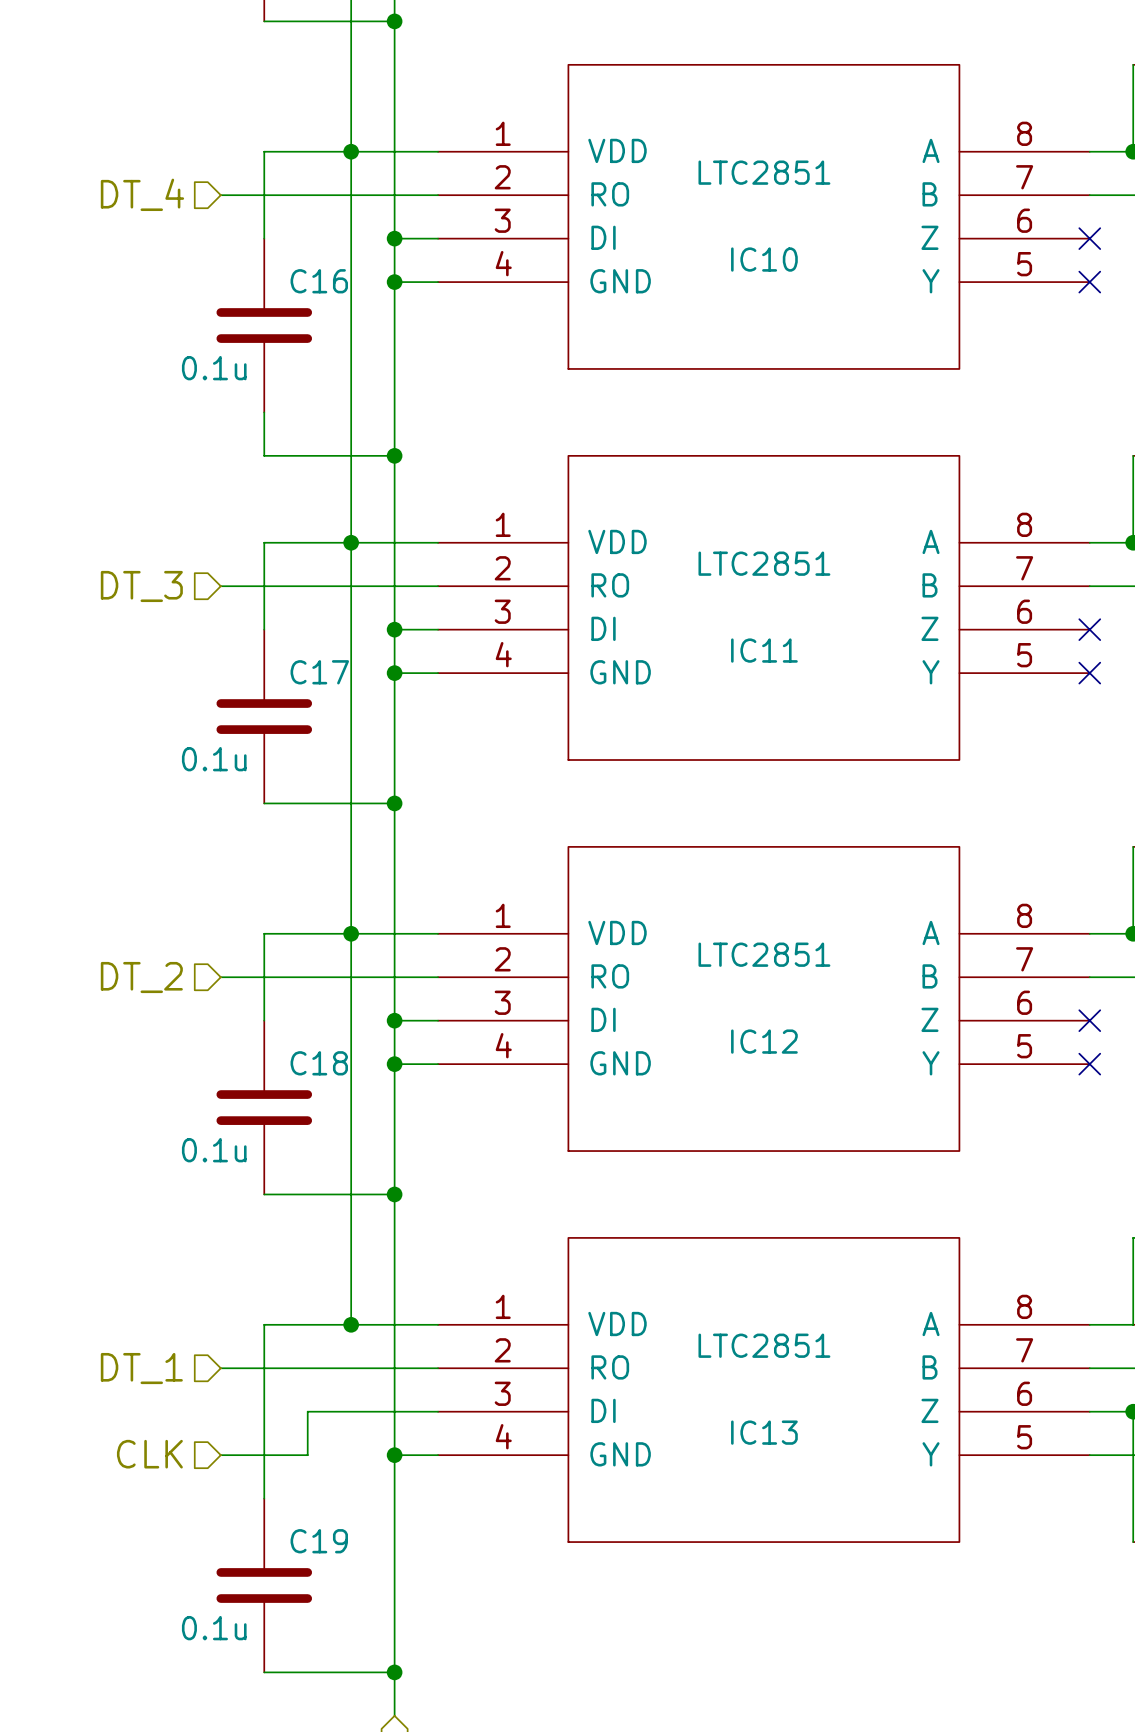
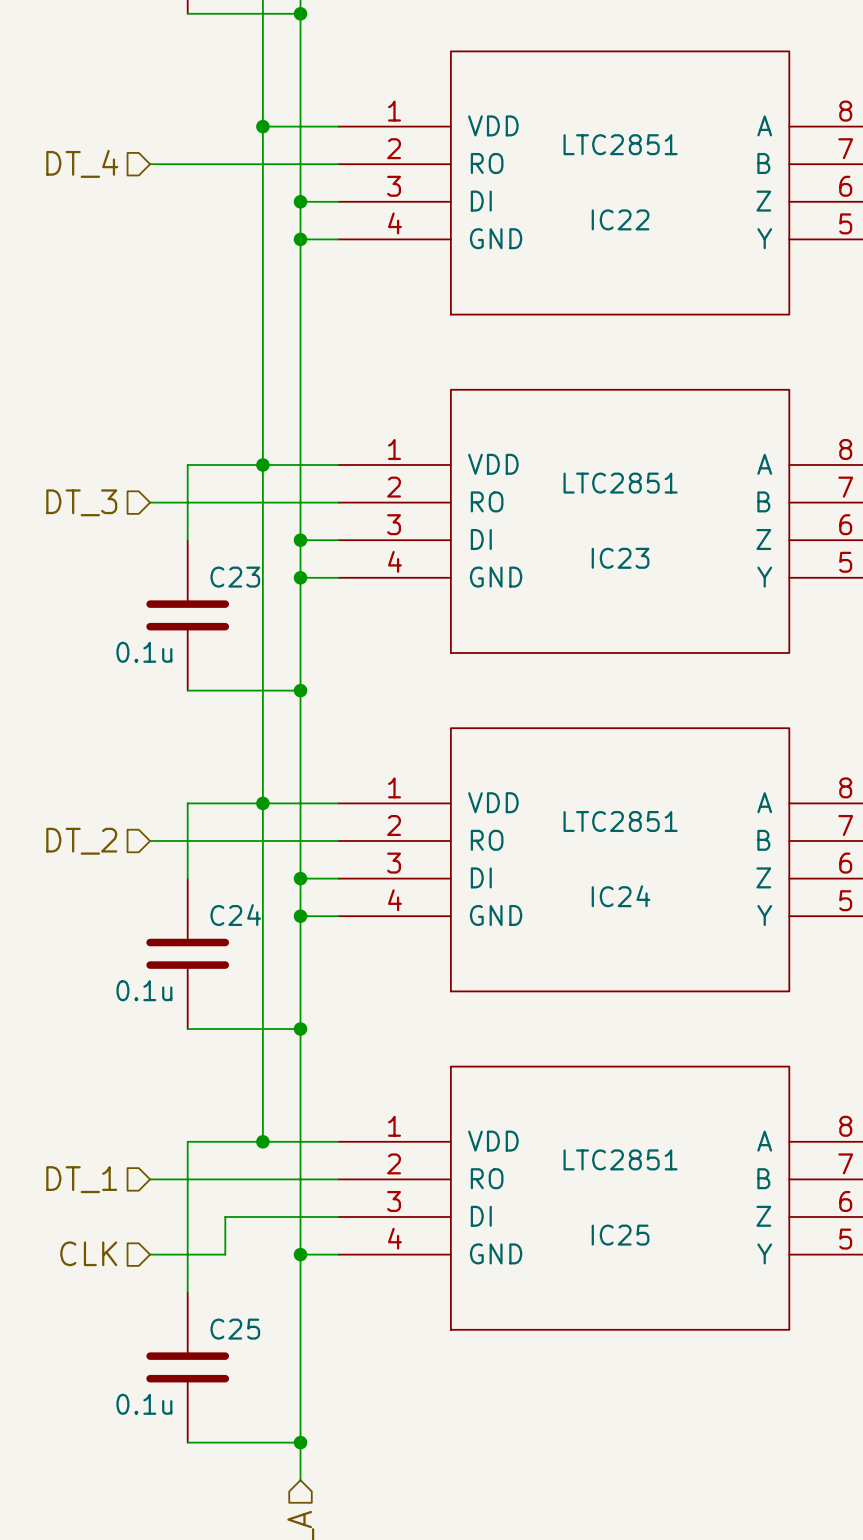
wire: (351, 151) (264, 151) (264, 238) -> none
IC10 name: IC10 (764, 259) -> IC22 (620, 219)
C16: 0.1u (264, 325) -> none
wire: (264, 412) (264, 455) (394, 455) -> none
junction: (394, 455) -> none
IC11 name: IC11 (764, 650) -> IC23 (620, 558)
C17 name: C17 (319, 672) -> C23 (235, 577)
IC12 name: IC12 (764, 1041) -> IC24 (621, 896)
C18 name: C18 (319, 1063) -> C24 (235, 915)
IC13 name: IC13 (764, 1432) -> IC25 (620, 1235)
C19 name: C19 (319, 1541) -> C25 (235, 1329)

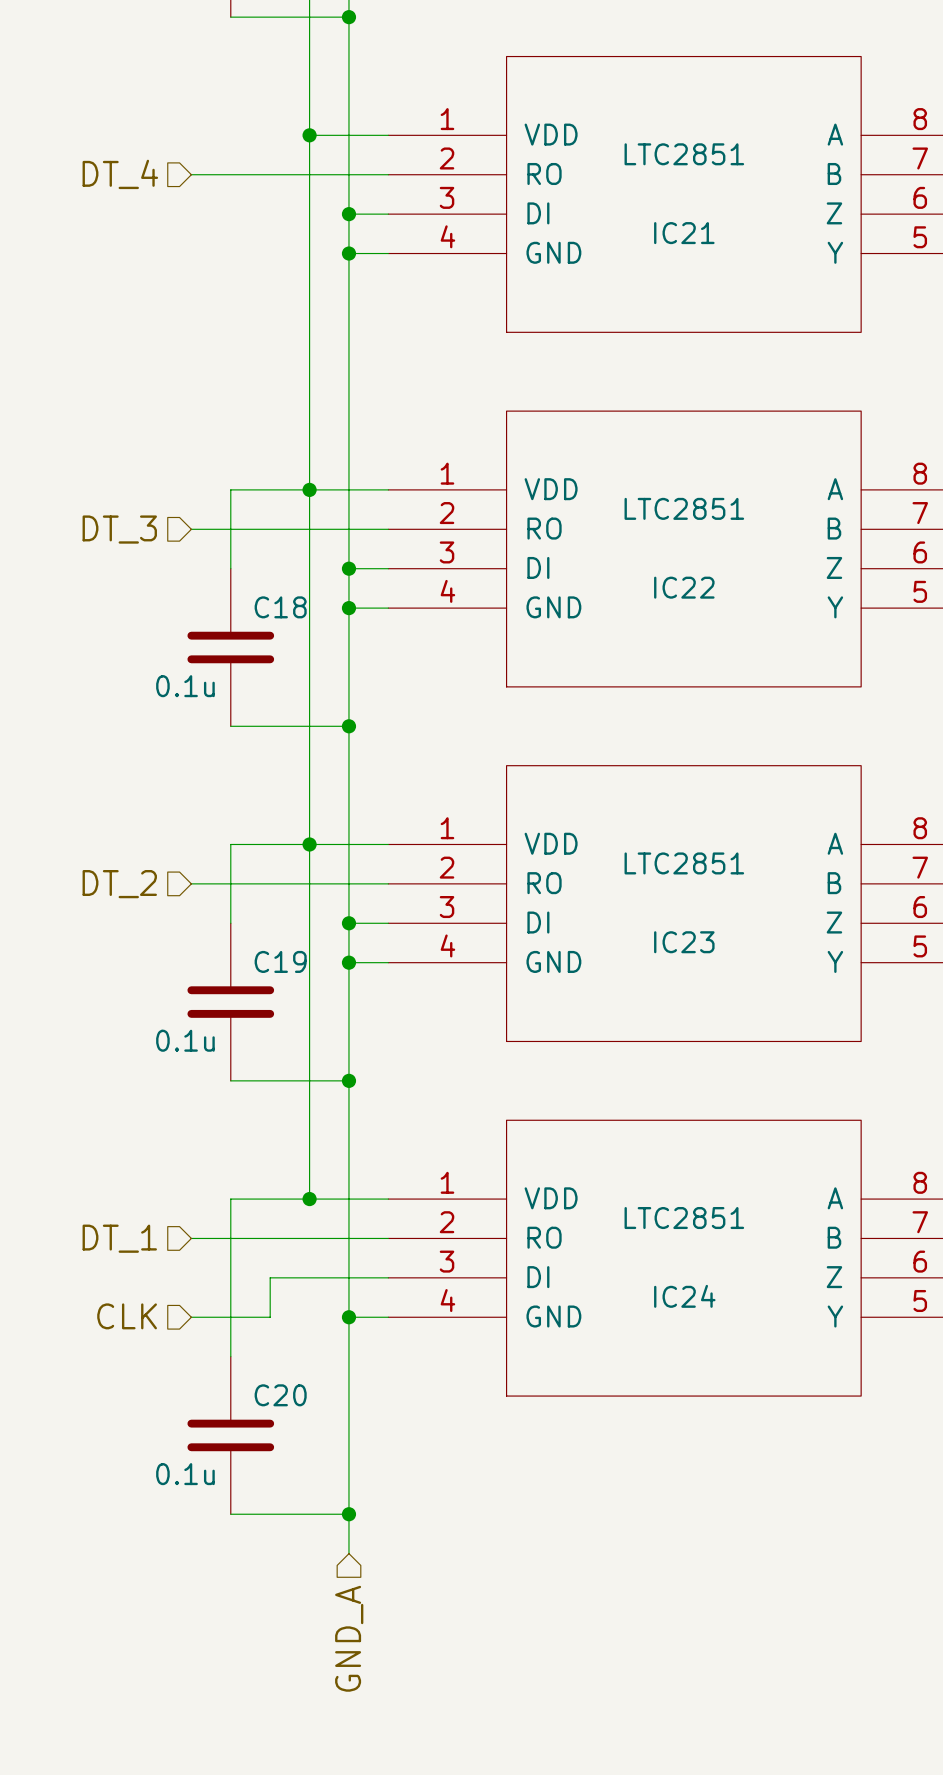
IC22 name: IC22 (620, 219) -> IC21 (684, 233)
IC23 name: IC23 (620, 558) -> IC22 (684, 587)
C23 name: C23 (235, 577) -> C18 (280, 607)
IC24 name: IC24 (621, 896) -> IC23 (684, 942)
C24 name: C24 (235, 915) -> C19 (280, 961)
IC25 name: IC25 (620, 1235) -> IC24 (684, 1296)
C25 name: C25 (235, 1329) -> C20 (280, 1395)

